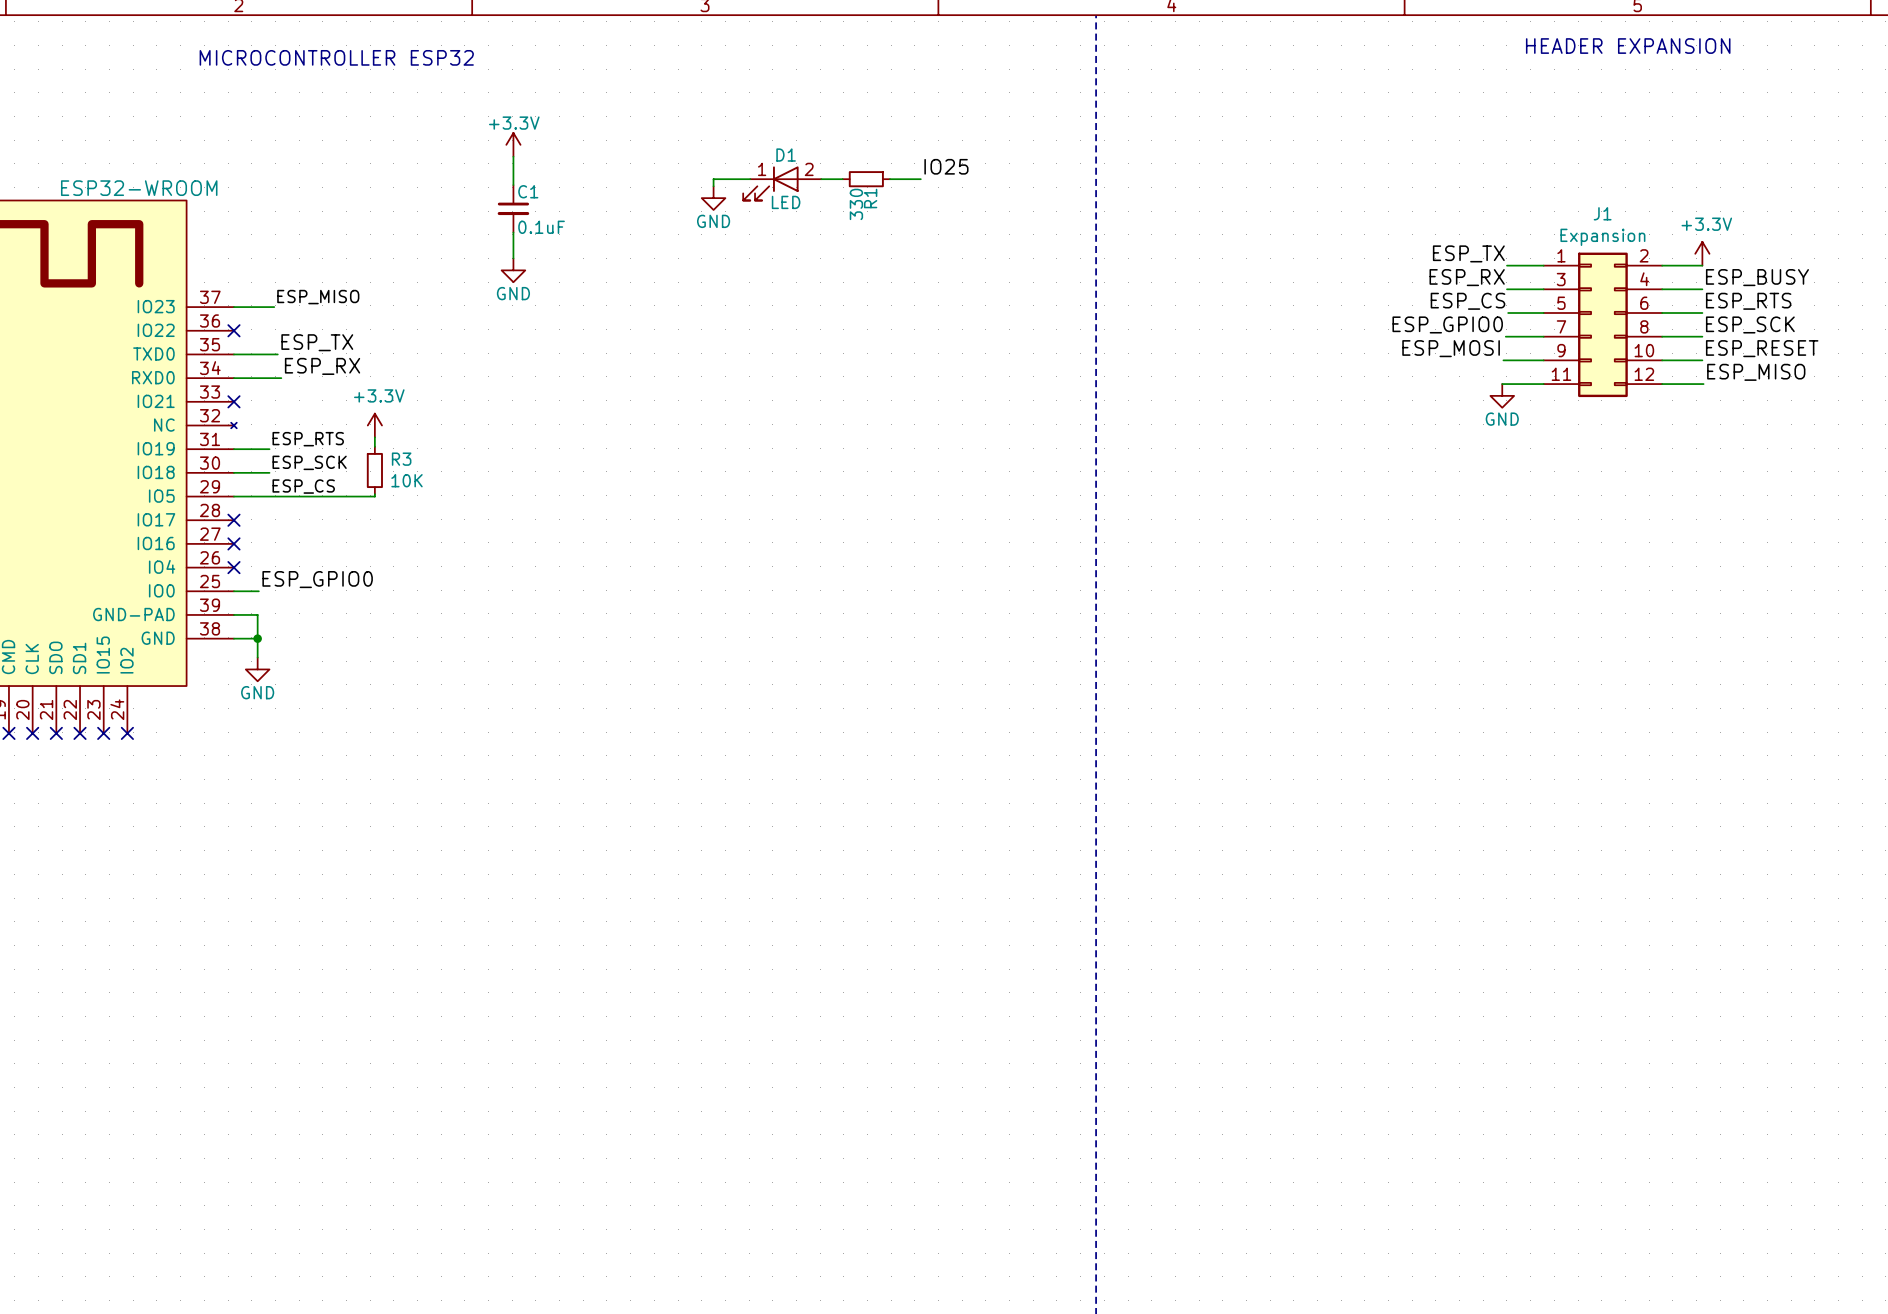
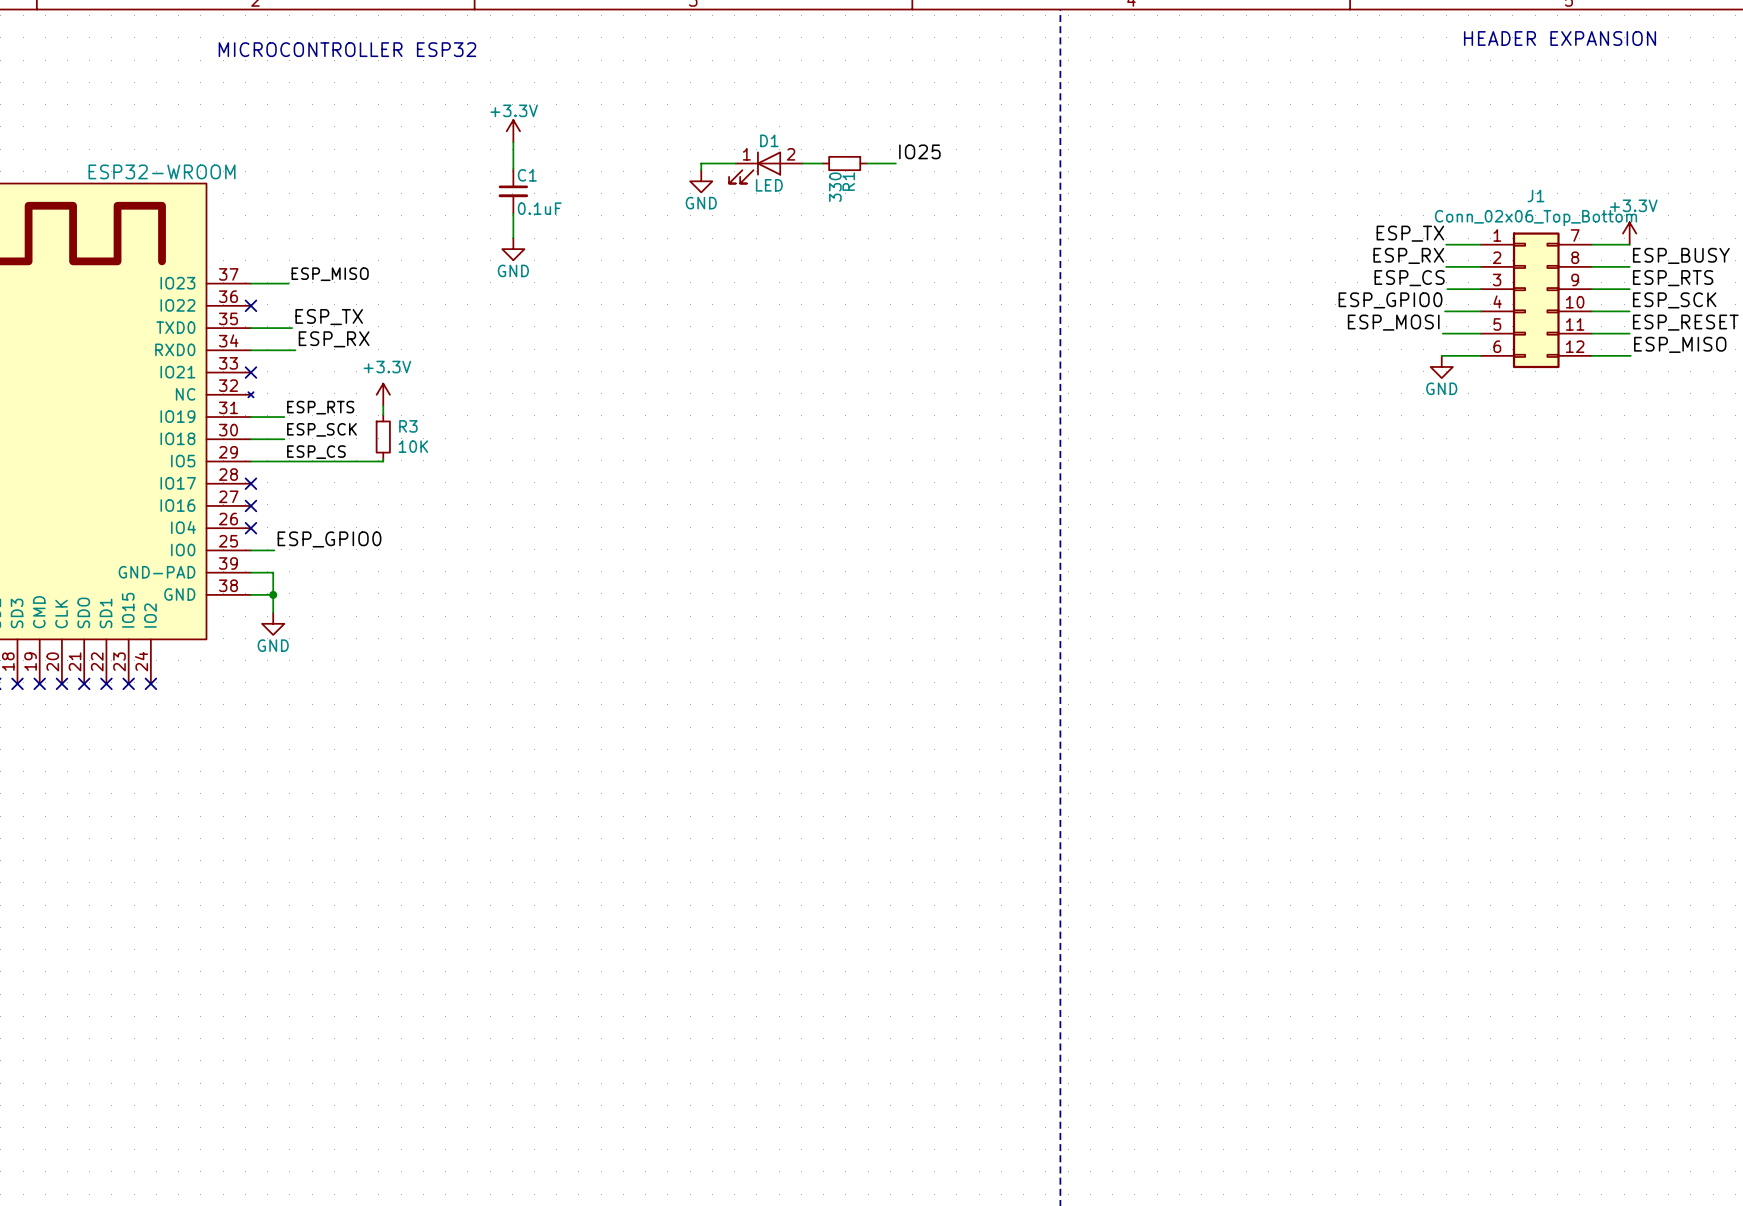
J1 value: Expansion (1602, 237) -> Conn_02x06_Top_Bottom (1535, 218)
J1 symbol: [1543, 252, 1663, 398] -> [1480, 232, 1592, 369]

